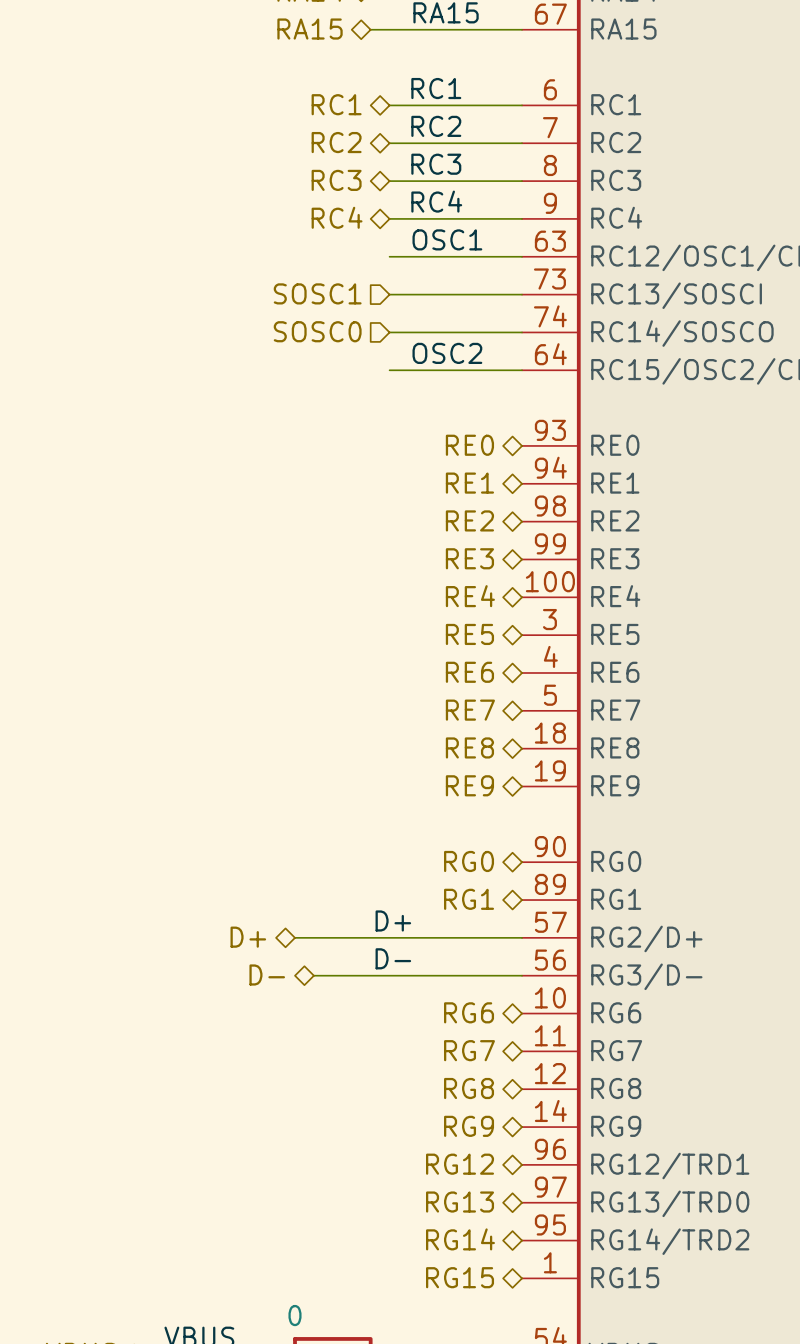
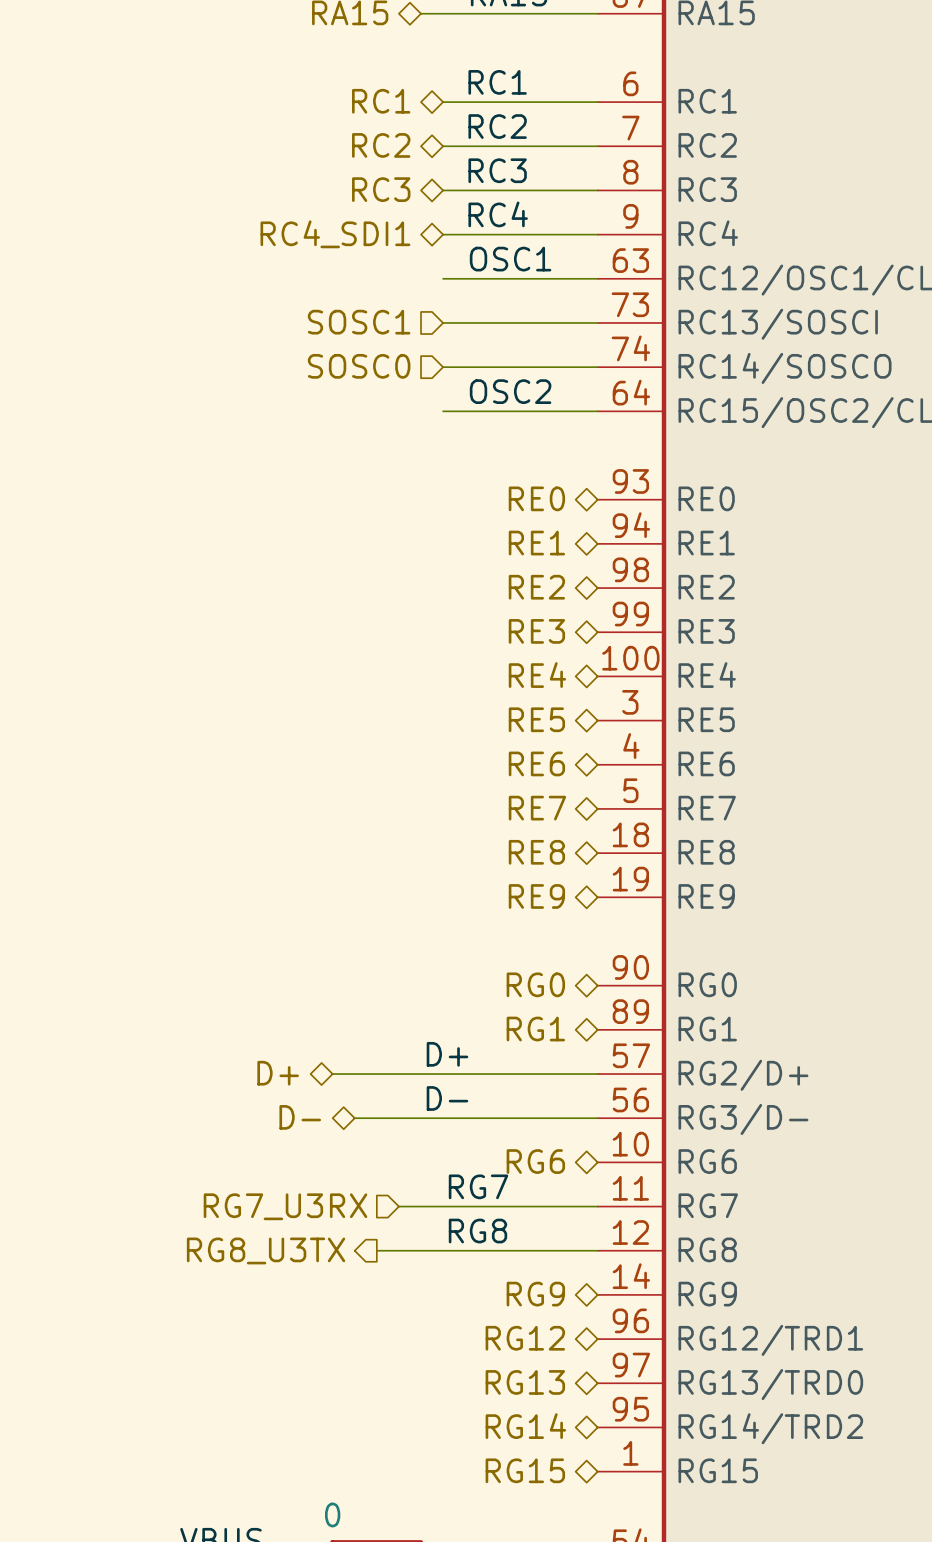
hierarchical label: RC4 (337, 217) -> RC4_SDI1 (335, 234)
label: none -> RG7 (478, 1186)
hierarchical label: RG7 (469, 1050) -> none
hierarchical label: none -> RG7_U3RX (285, 1206)
wire: none -> (398, 1206) (597, 1206)
label: none -> RG8 (477, 1231)
hierarchical label: RG8 (469, 1088) -> none
hierarchical label: none -> RG8_U3TX (266, 1250)
wire: none -> (376, 1250) (597, 1250)

